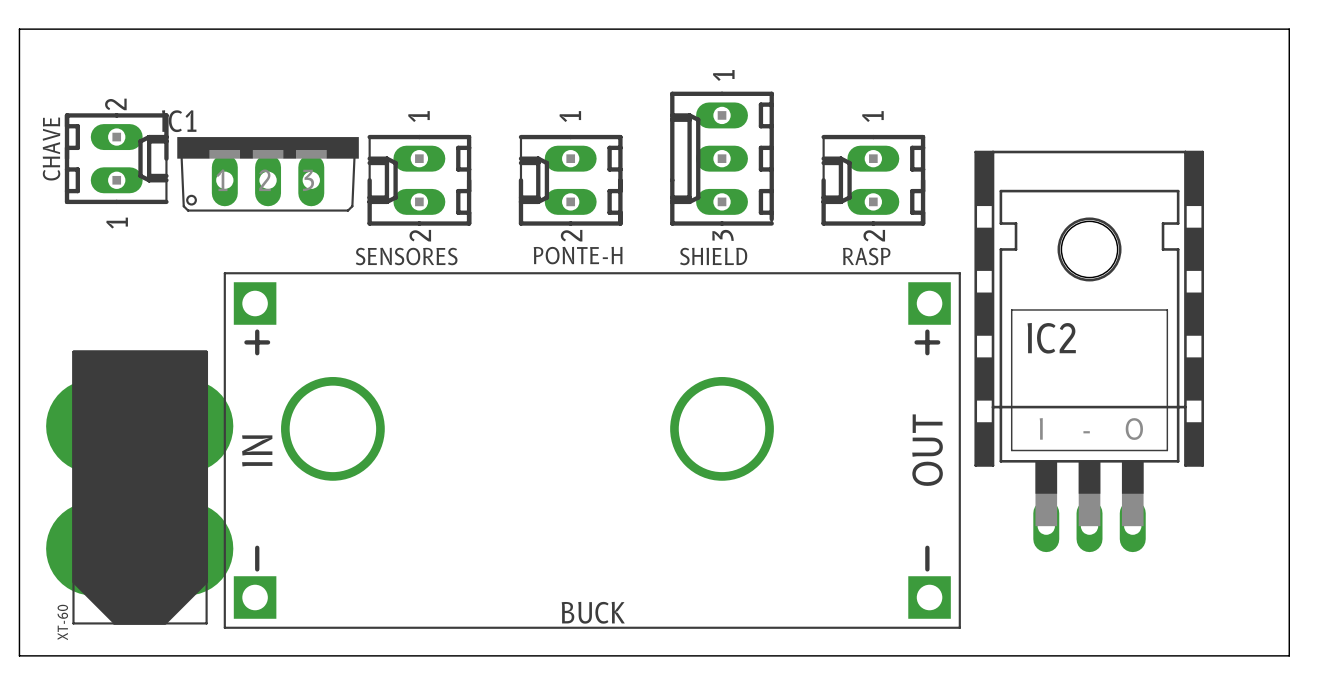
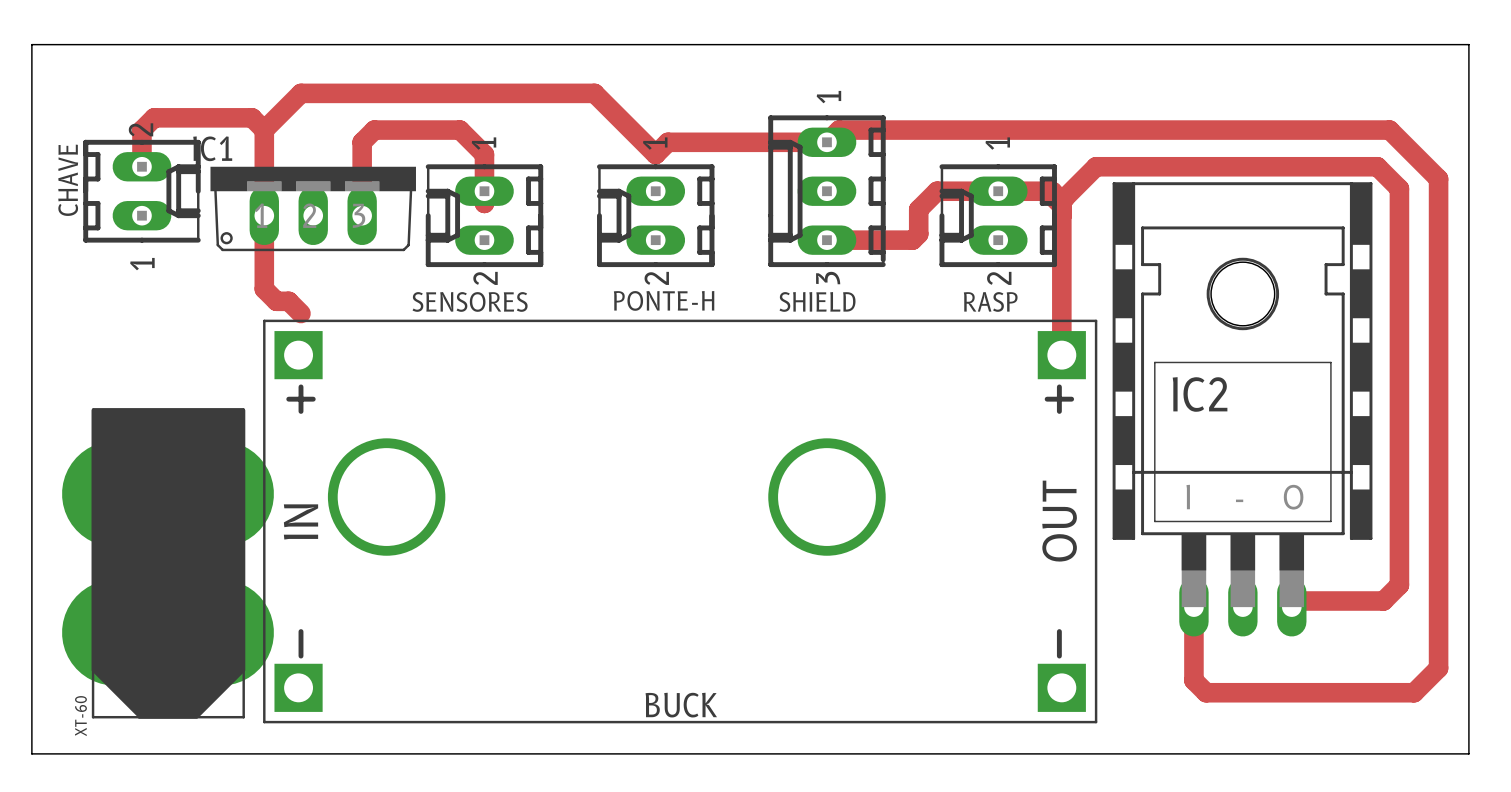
track: none -> (264, 130) (264, 289) (276, 301) (288, 301) (300, 313)
track: none -> (264, 130) (252, 117) (154, 117) (141, 130) (141, 166)
track: none -> (264, 130) (300, 93) (594, 93) (655, 154) (667, 142) (826, 142) (839, 130) (1389, 130) (1438, 178) (1438, 668) (1414, 692) (1206, 692) (1193, 680) (1193, 607)
track: none -> (1061, 201) (1096, 166) (1377, 166) (1399, 188) (1399, 585) (1383, 601) (1297, 601) (1291, 607)
track: none -> (1061, 201) (1061, 350)
track: none -> (1061, 201) (1052, 191) (937, 191) (918, 209) (918, 234) (912, 240) (826, 240)
track: none -> (484, 203) (484, 154) (460, 130) (374, 130) (362, 142) (362, 215)

